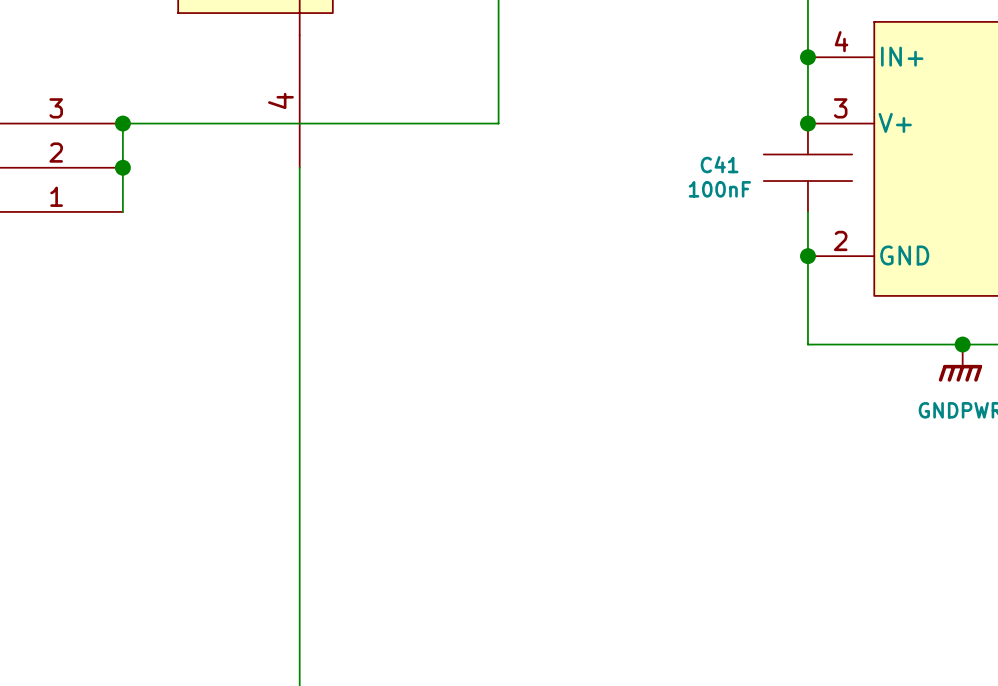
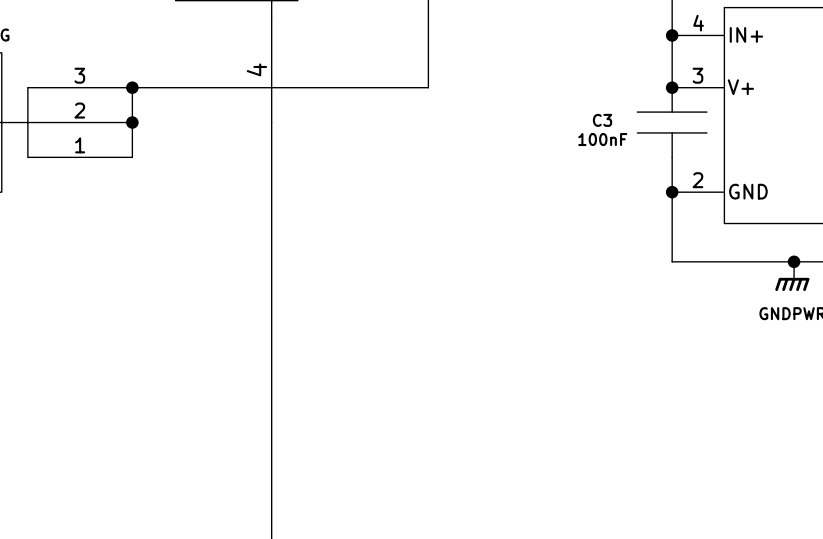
C41 name: C41 (719, 164) -> C3 (602, 120)

